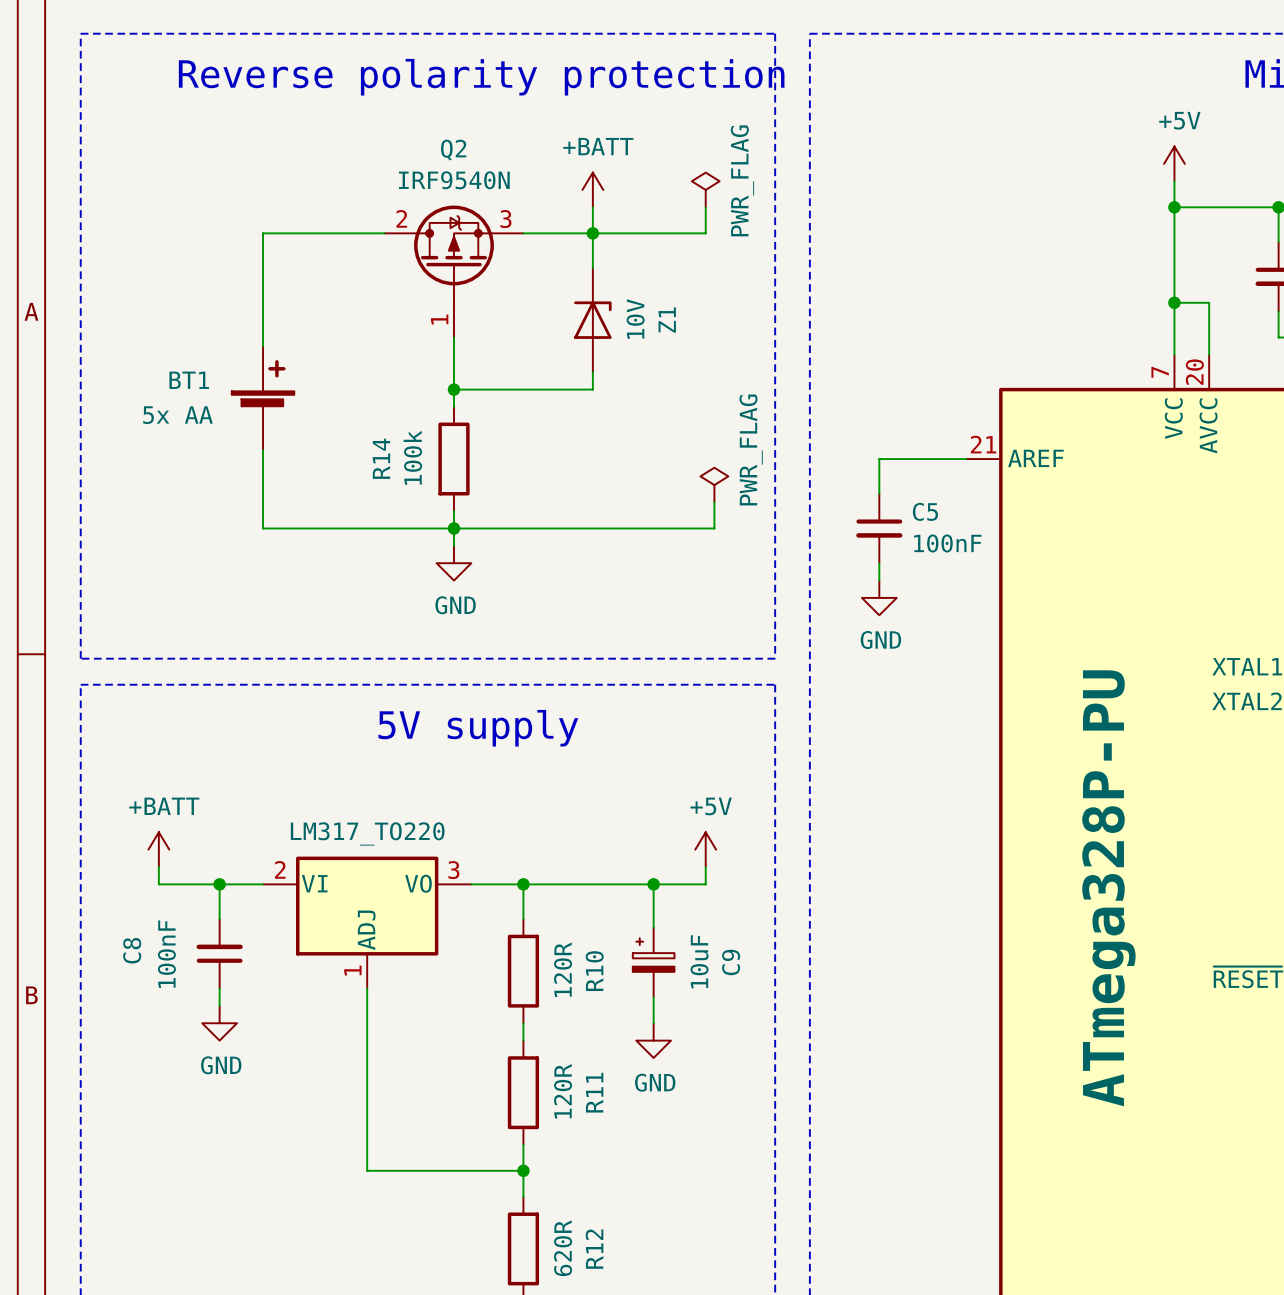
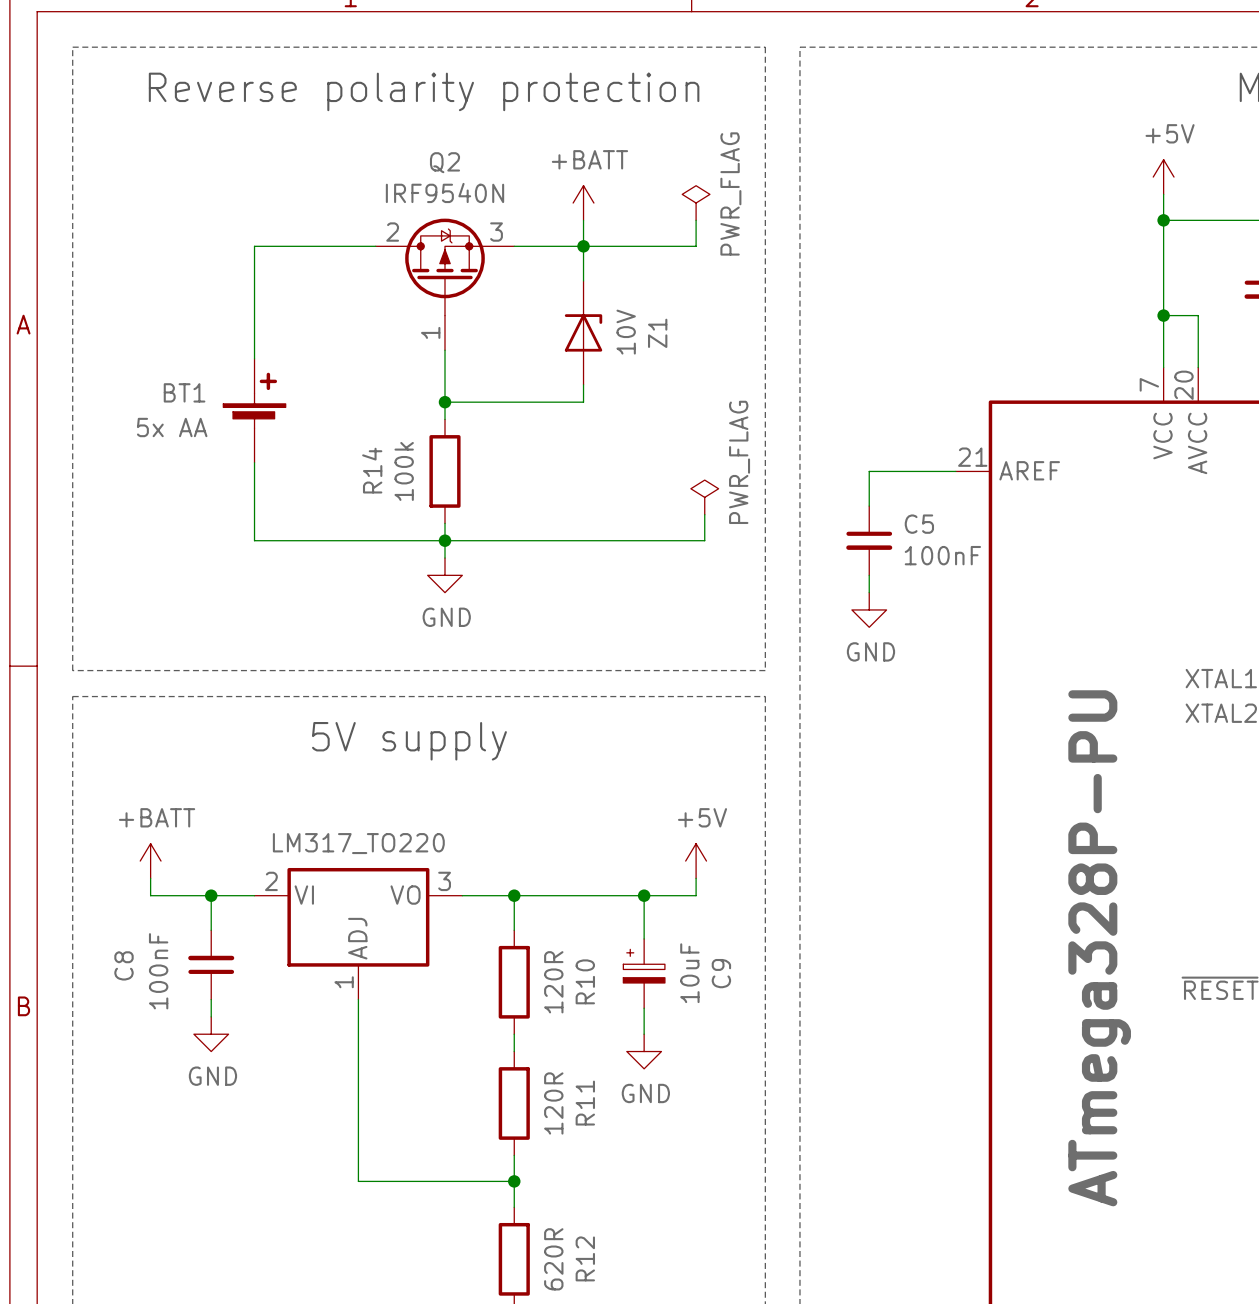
text position: Reverse polarity protection (481, 77) -> Reverse polarity protection (424, 91)
text position: 5V supply (478, 728) -> 5V supply (409, 741)

